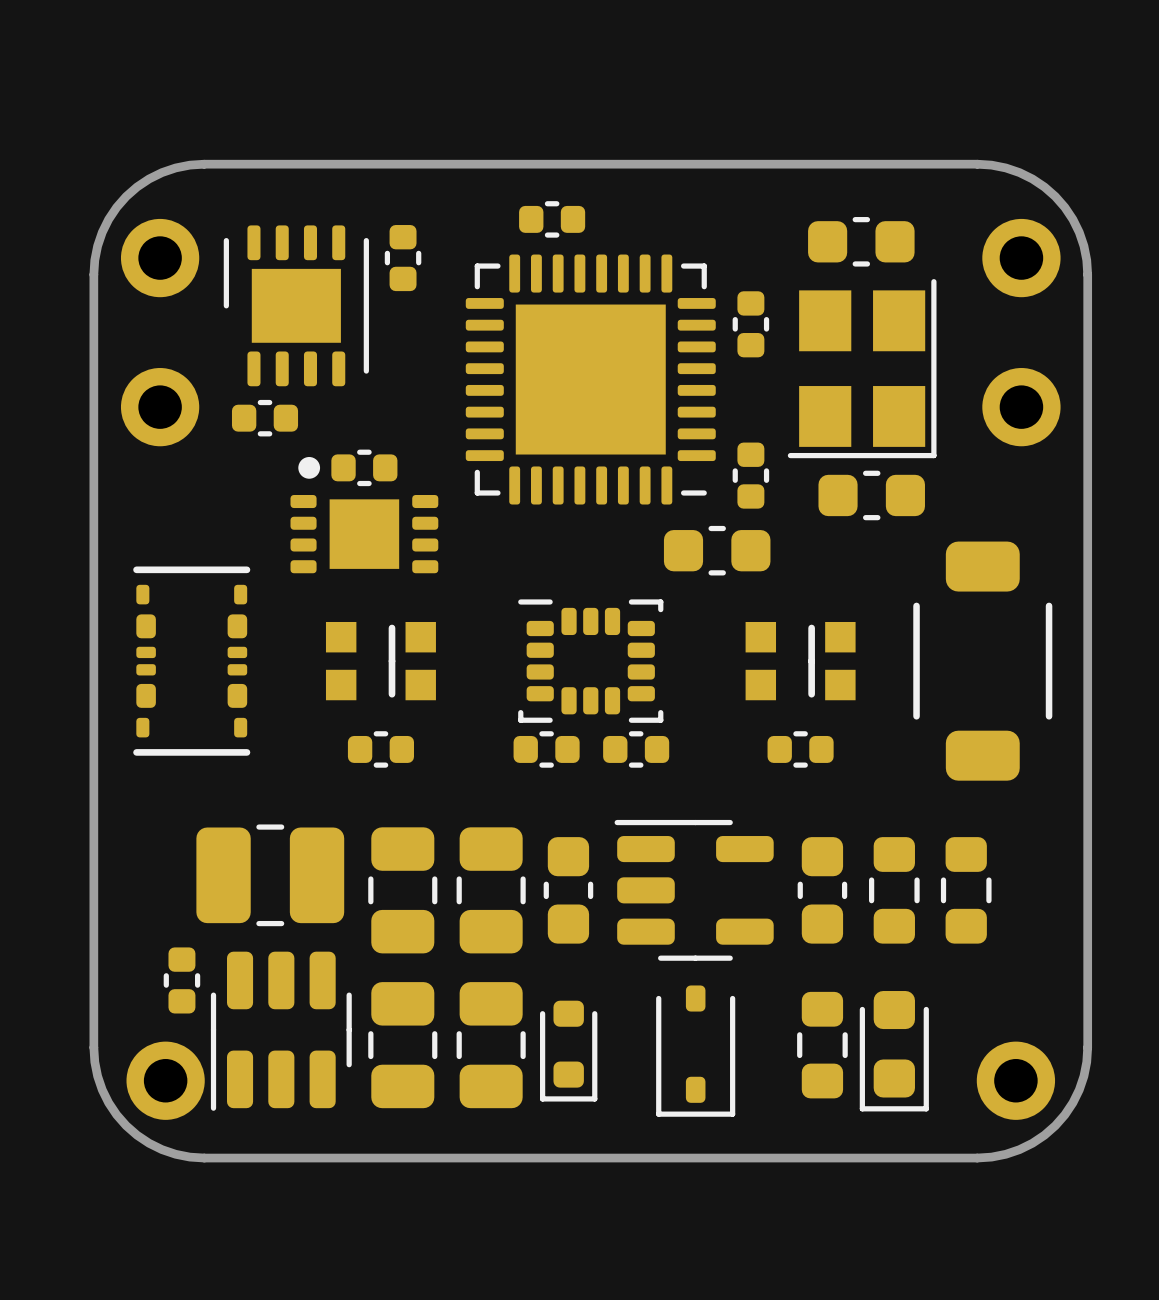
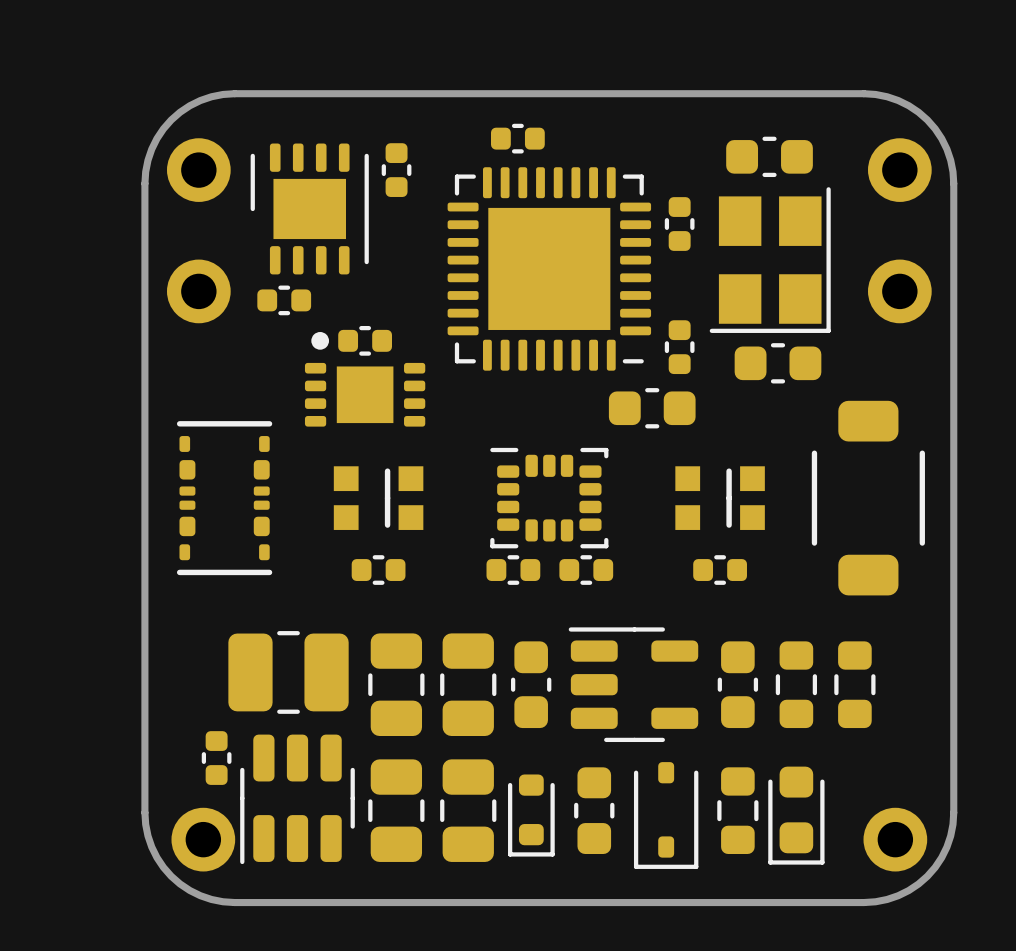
part: none -> (594, 810)
part position: (695, 1051) -> (666, 815)

